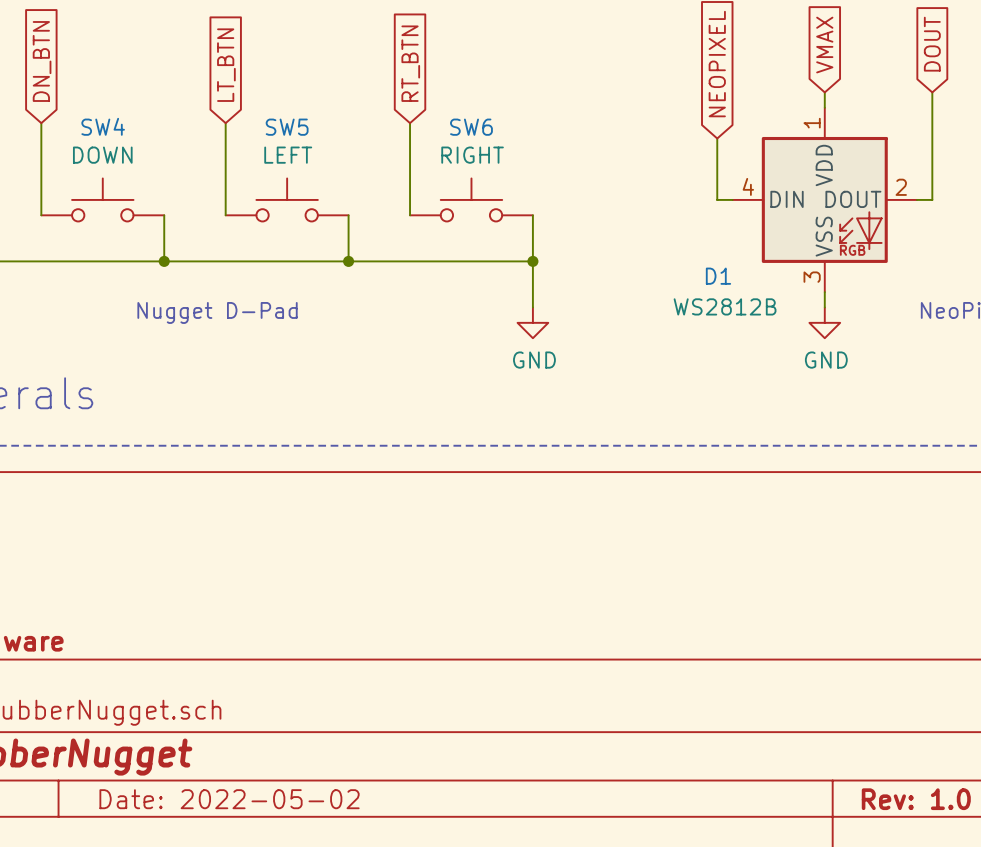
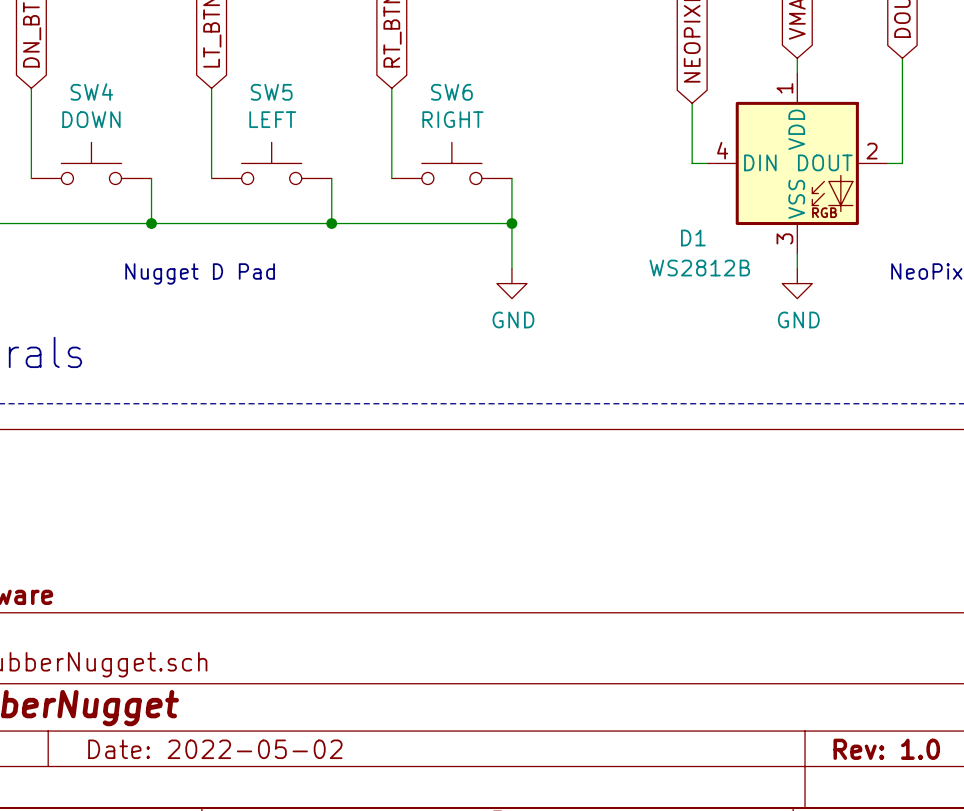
text: Nugget D-Pad (217, 312) -> Nugget D Pad (200, 273)

